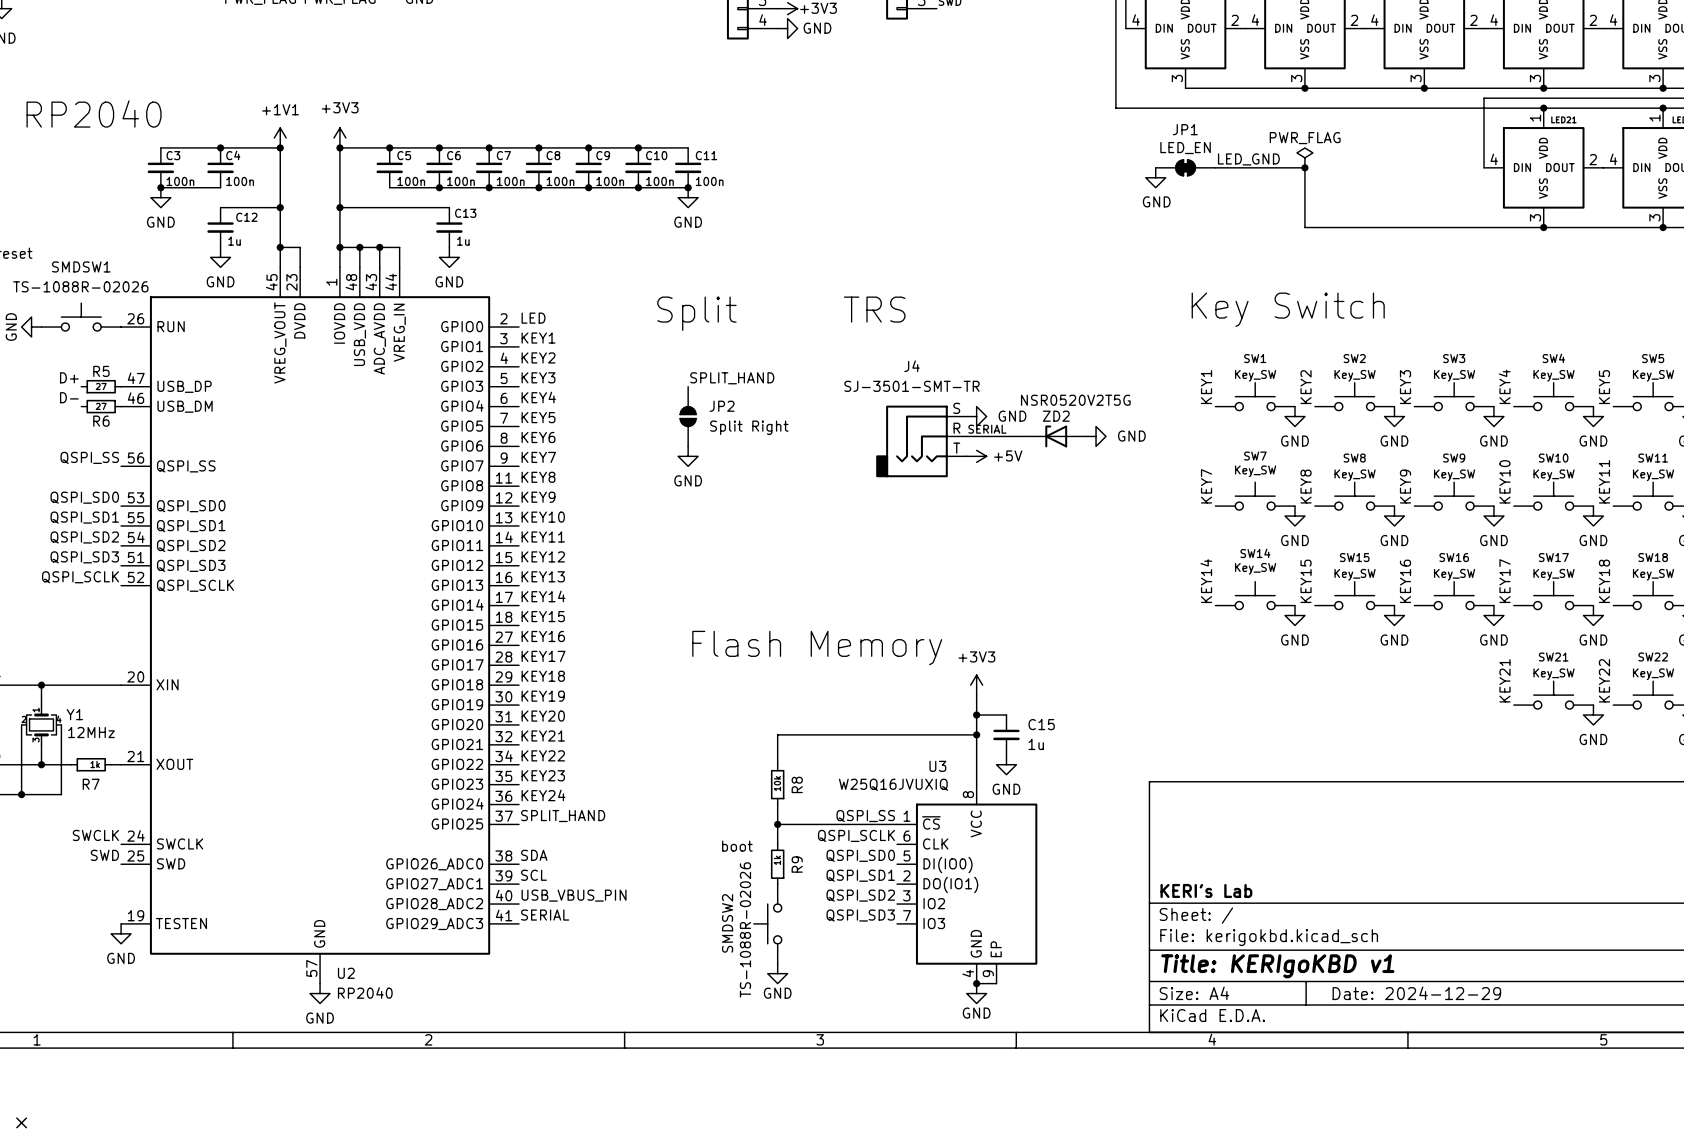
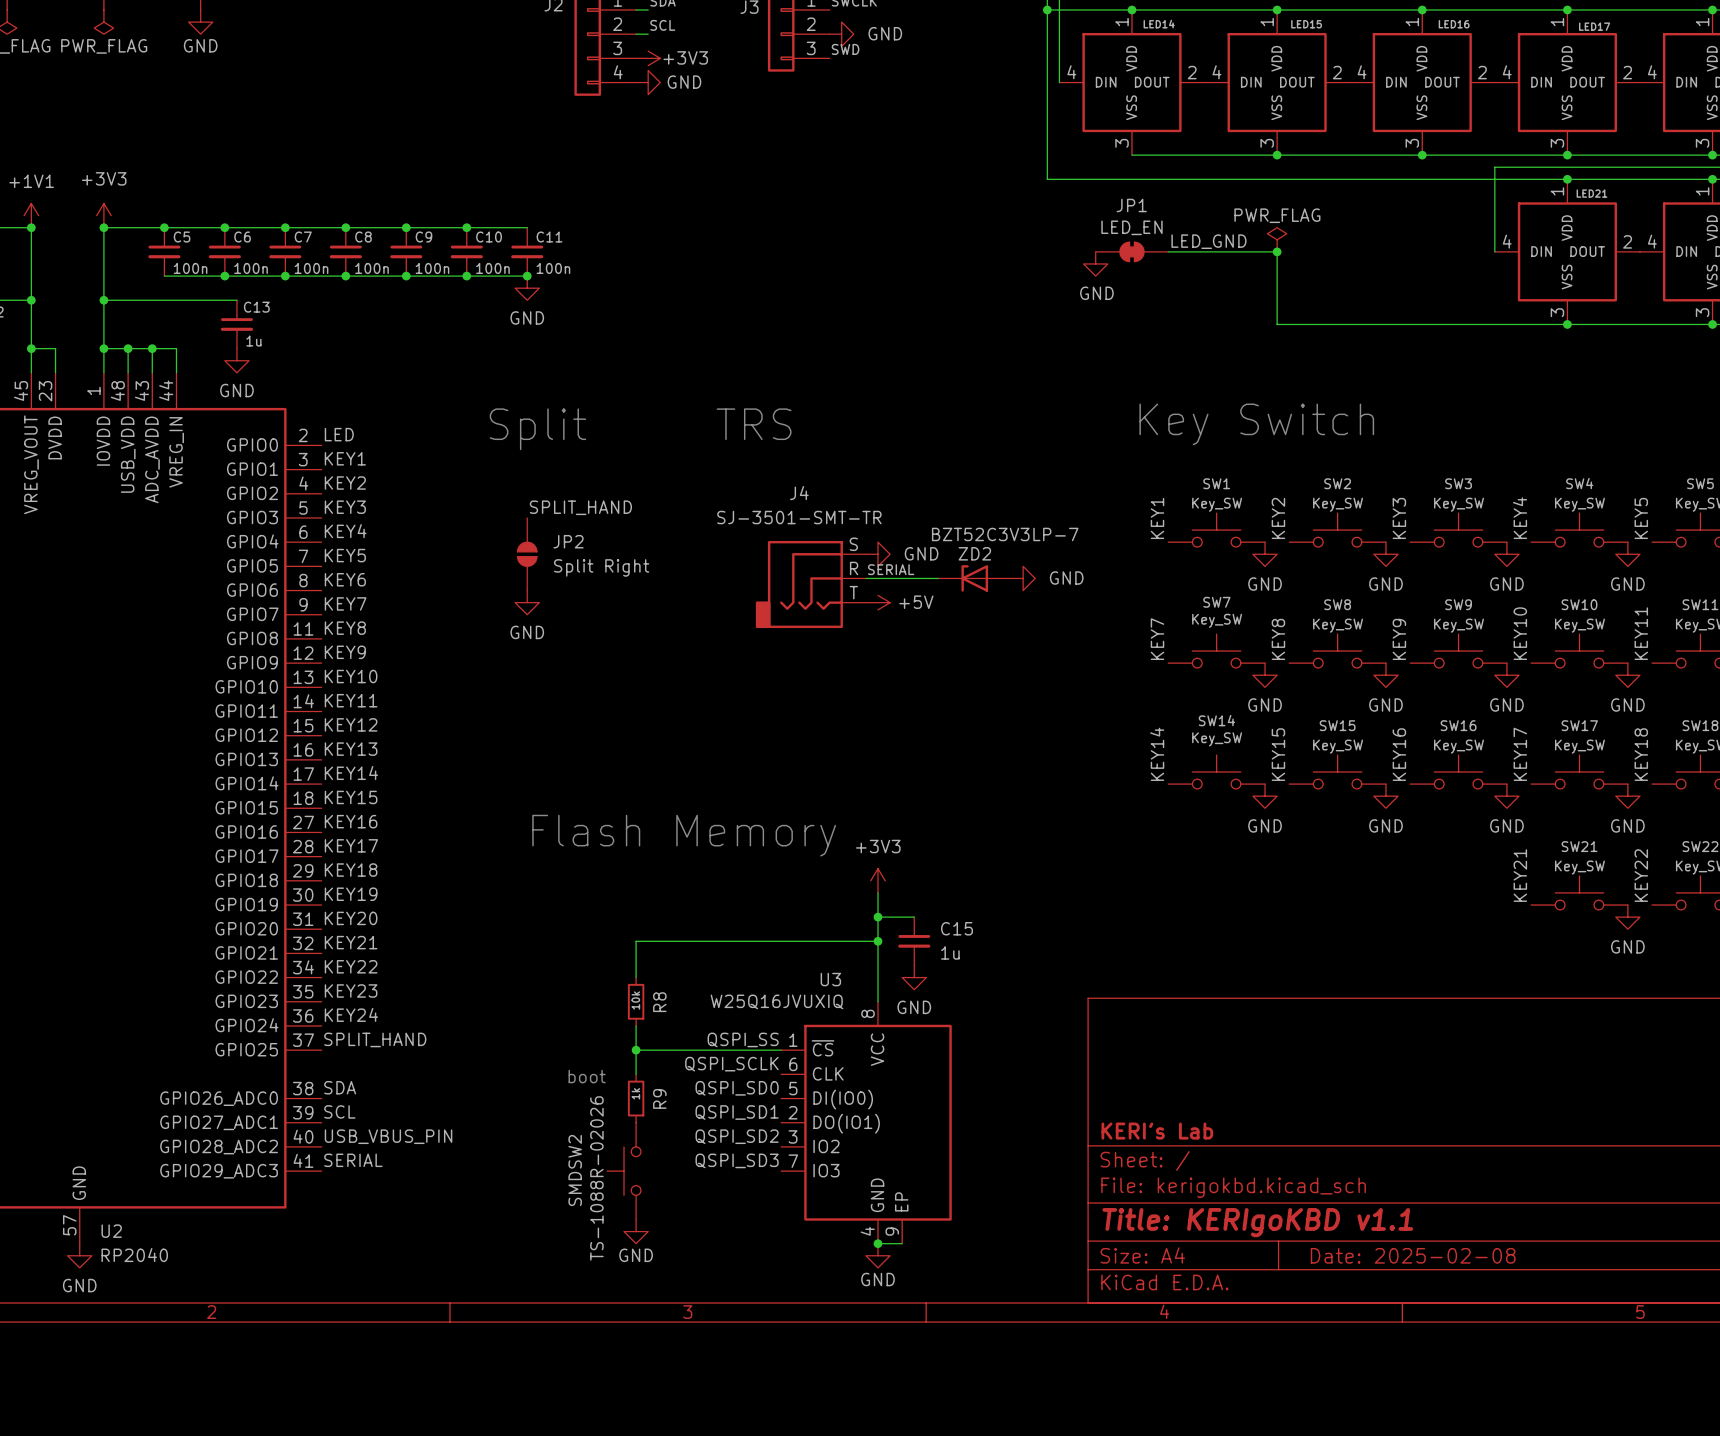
ZD2 value: NSR0520V2T5G (1075, 400) -> BZT52C3V3LP-7 (1005, 534)
title block: Title: KERIgoKBD v1 (1277, 966) -> Title: KERIgoKBD v1.1 (1257, 1222)
title block: Date: 2024-12-29 (1416, 993) -> Date: 2025-02-08 (1413, 1255)

